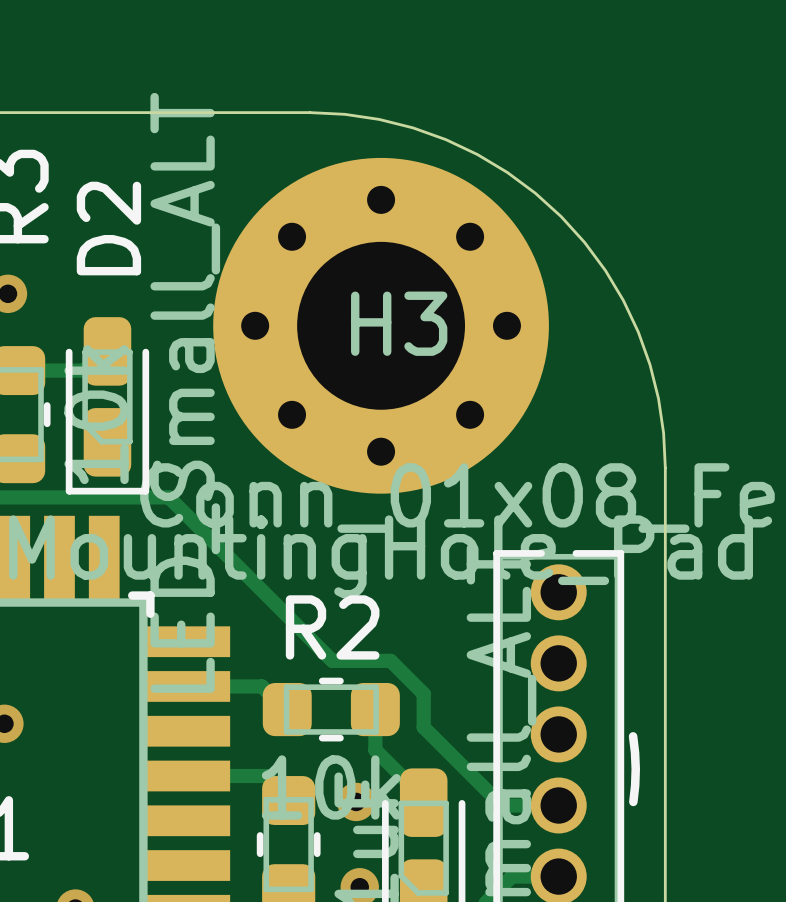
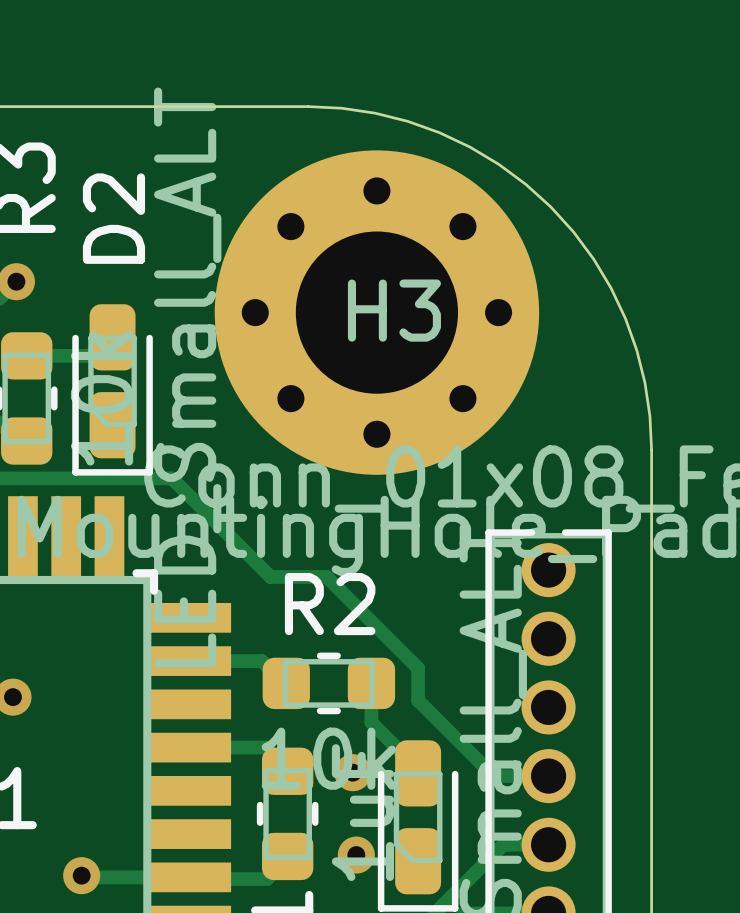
track: (270, 599) (332, 660) (390, 660) -> (270, 576) (326, 576) (386, 636)
line: (633, 736) (635, 769) (633, 801) -> none

